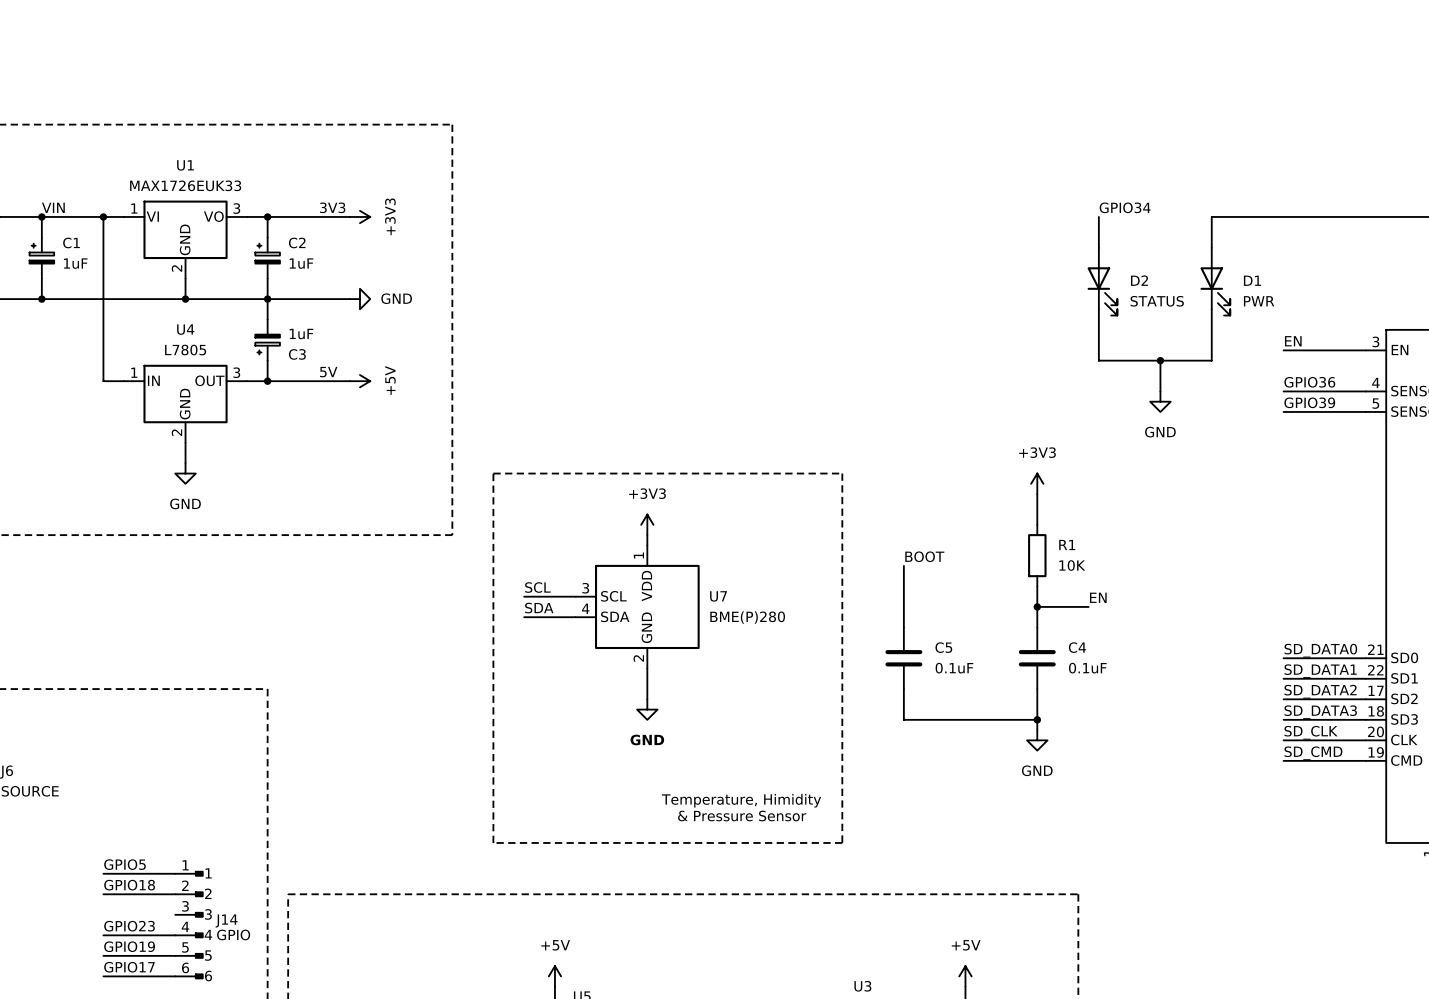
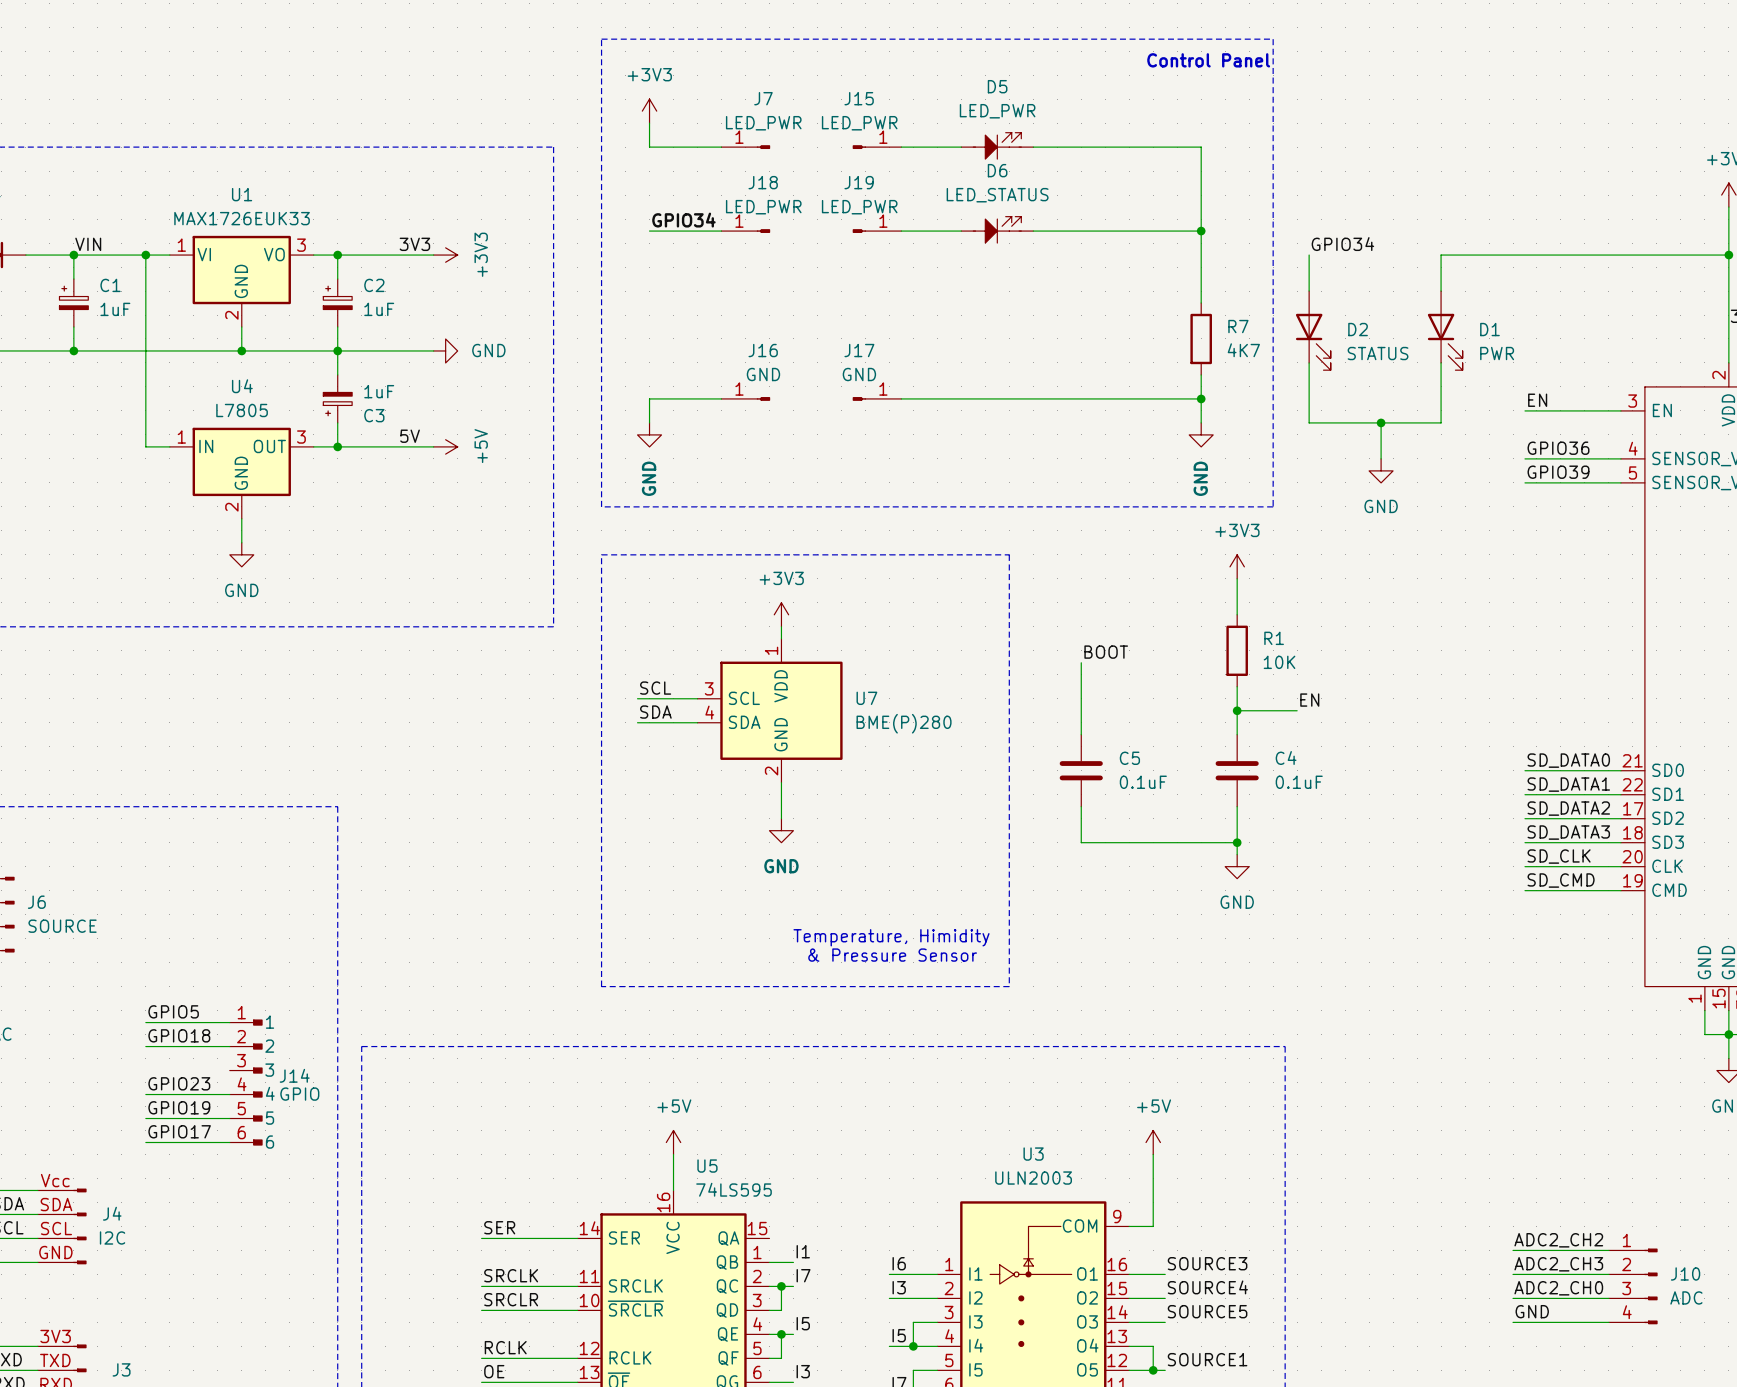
line: none -> (601, 39) (1273, 39) (1273, 506) (601, 506) (601, 39)
text: none -> Control Panel (1208, 60)
power symbol: none -> +3V3 (649, 111)
wire: none -> (649, 123) (649, 147) (721, 147)
D5: none -> LED_PWR (997, 145)
J7: none -> LED_PWR (745, 147)
J15: none -> LED_PWR (877, 147)
wire: none -> (901, 147) (961, 147)
wire: none -> (1033, 147) (1201, 147) (1201, 303)
label: none -> GPIO34 (683, 220)
D6: none -> LED_STATUS (997, 229)
wire: none -> (649, 231) (721, 231)
J18: none -> LED_PWR (745, 231)
J19: none -> LED_PWR (877, 231)
wire: none -> (901, 231) (961, 231)
wire: none -> (1033, 231) (1201, 231)
junction: none -> (1201, 231)
R7: none -> 4K7 (1201, 338)
wire: none -> (1201, 374) (1201, 422)
wire: none -> (721, 398) (649, 398) (649, 422)
J16: none -> GND (745, 398)
J17: none -> GND (877, 398)
wire: none -> (901, 398) (1201, 398)
junction: none -> (1201, 398)
power symbol: none -> GND (649, 434)
power symbol: none -> GND (1201, 434)

